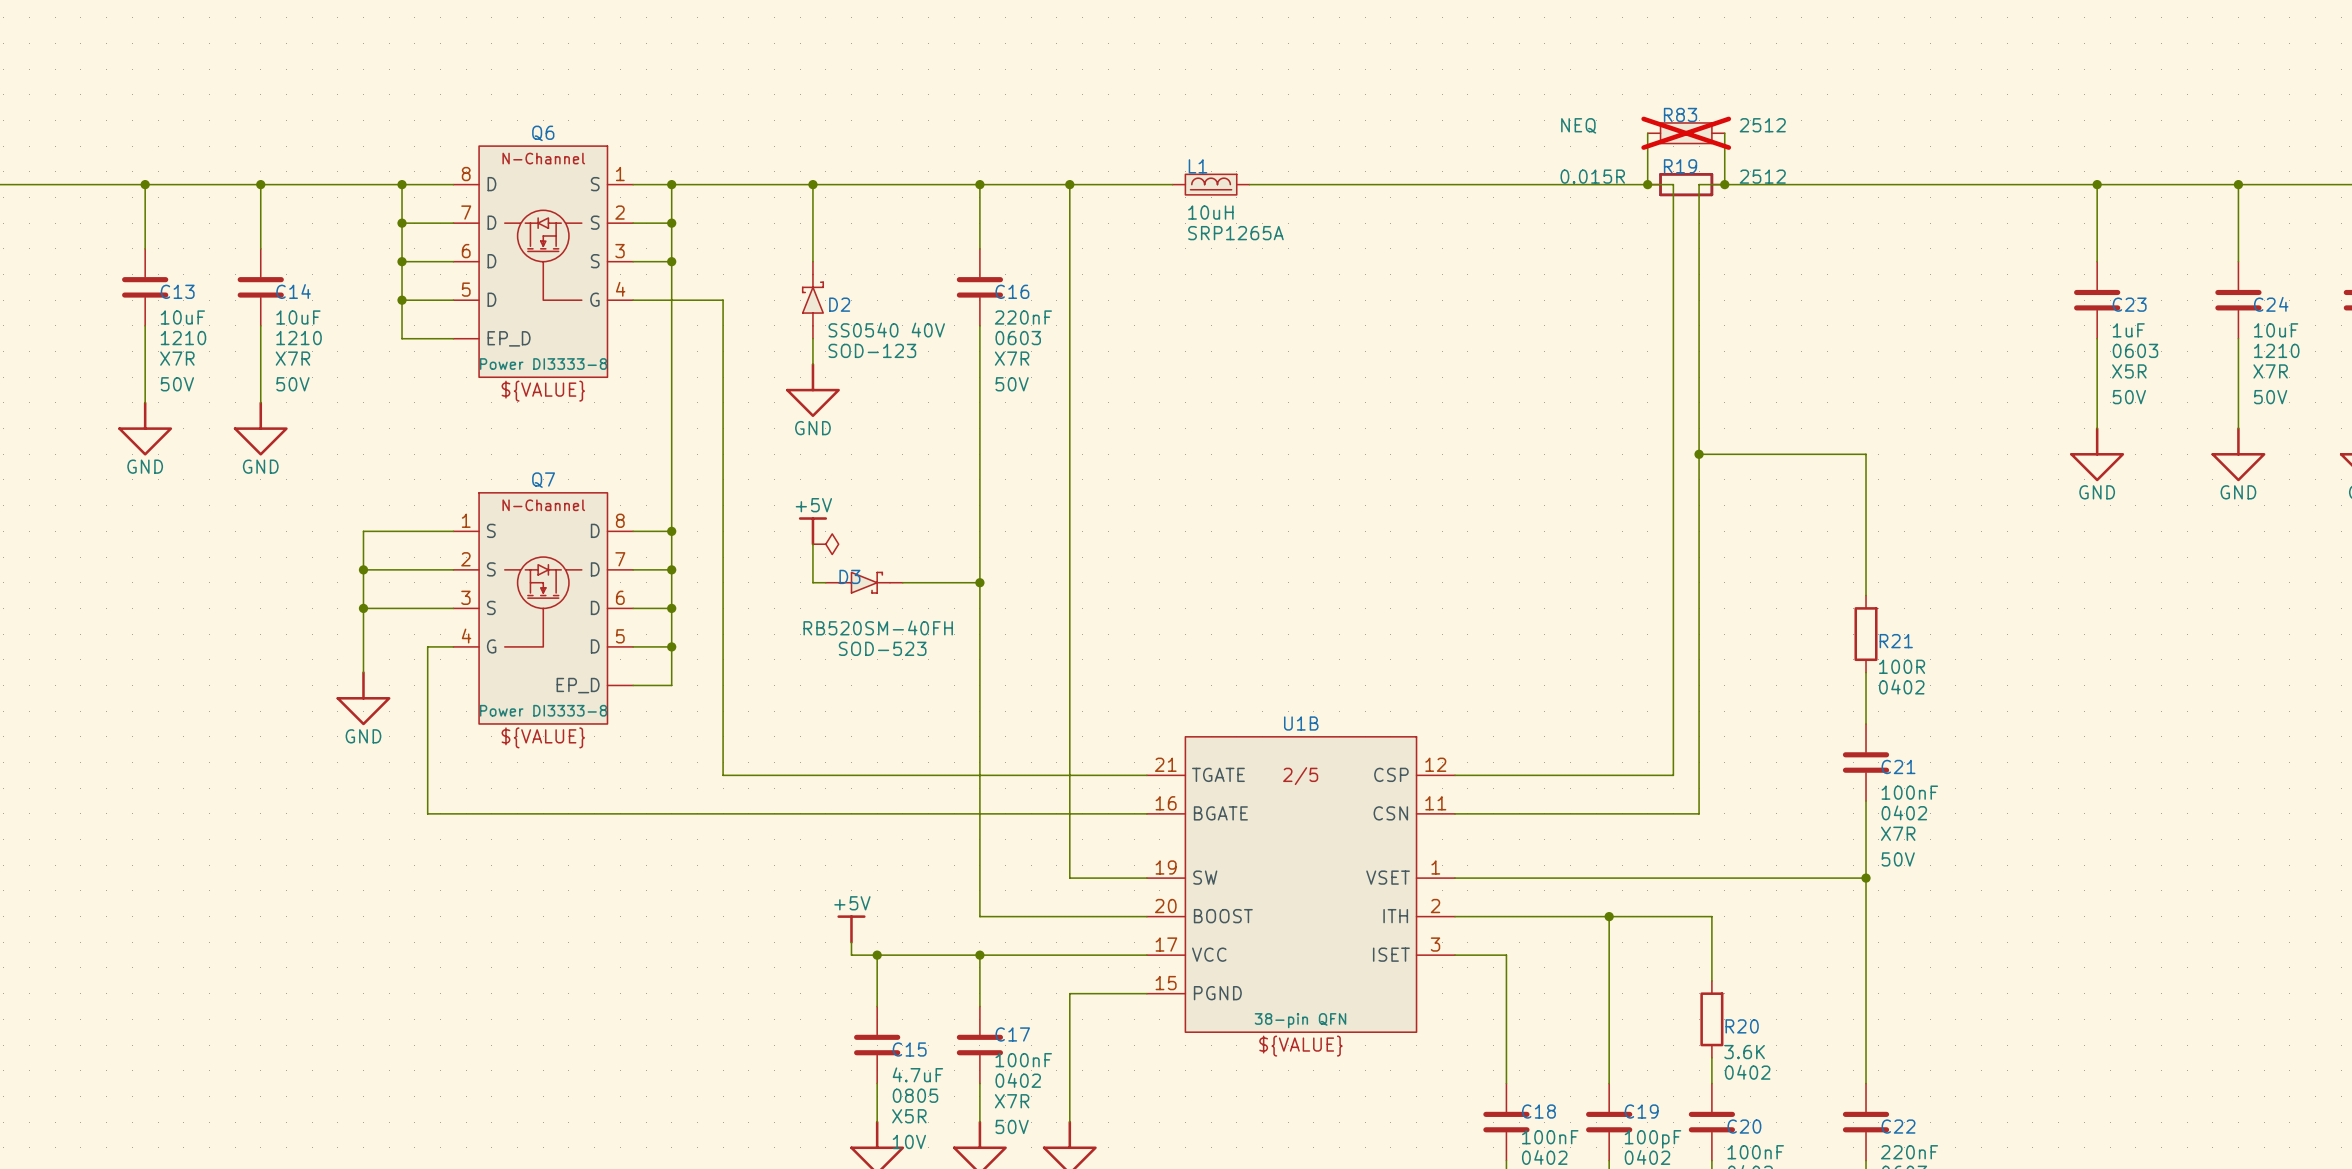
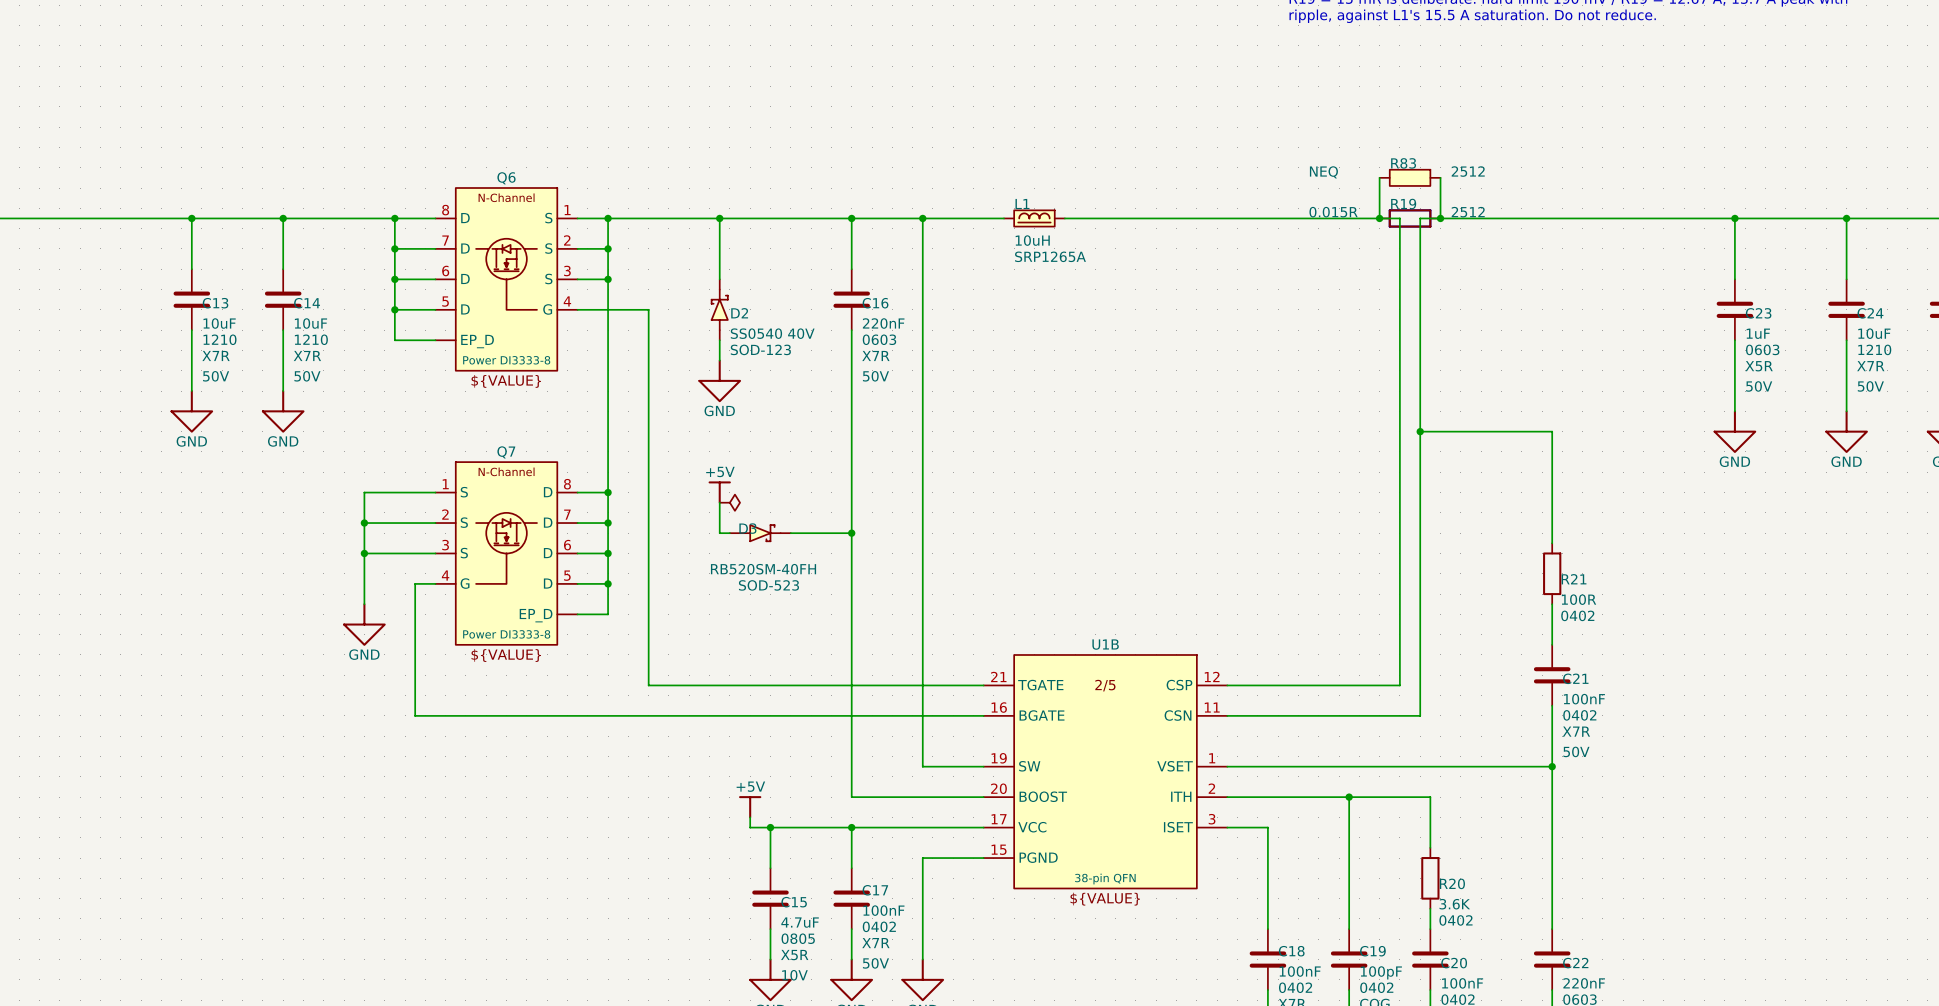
R83 do-not-place cross: (1686, 133) -> none

